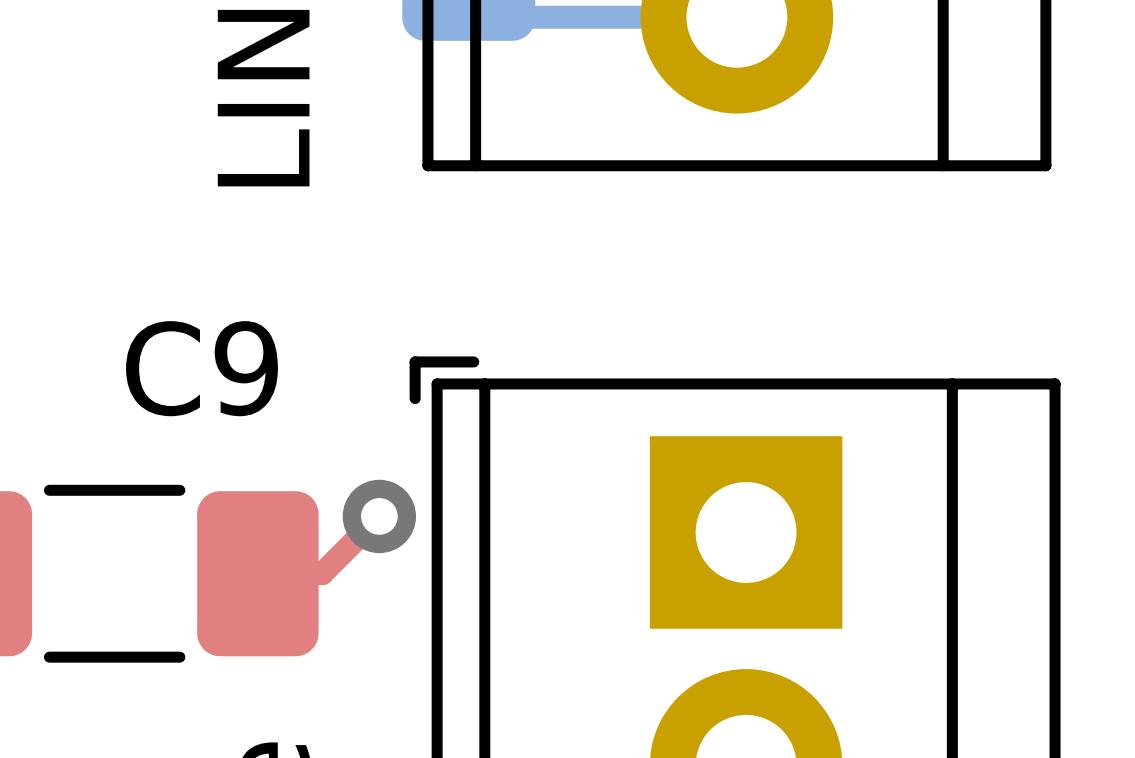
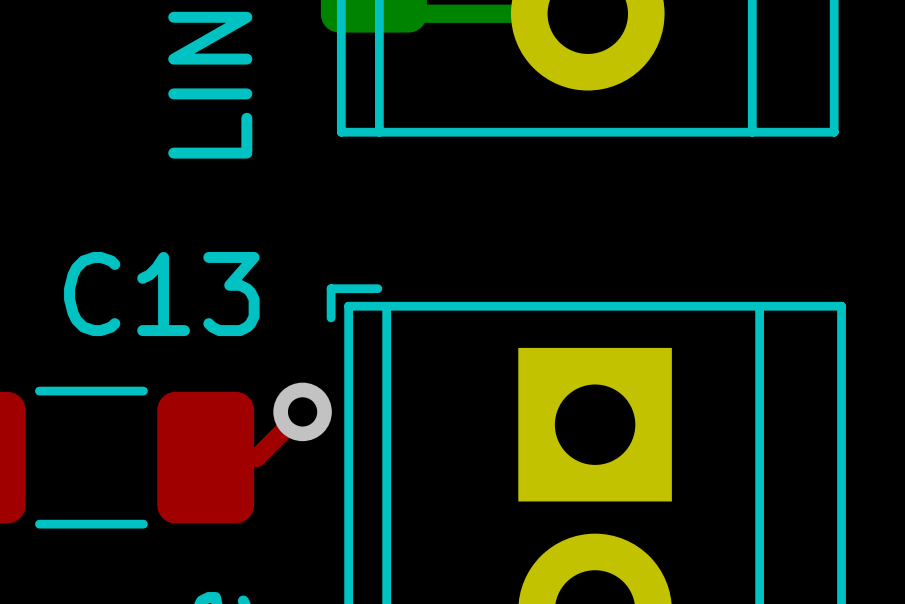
C9 name: C9 (201, 368) -> C13 (161, 294)

